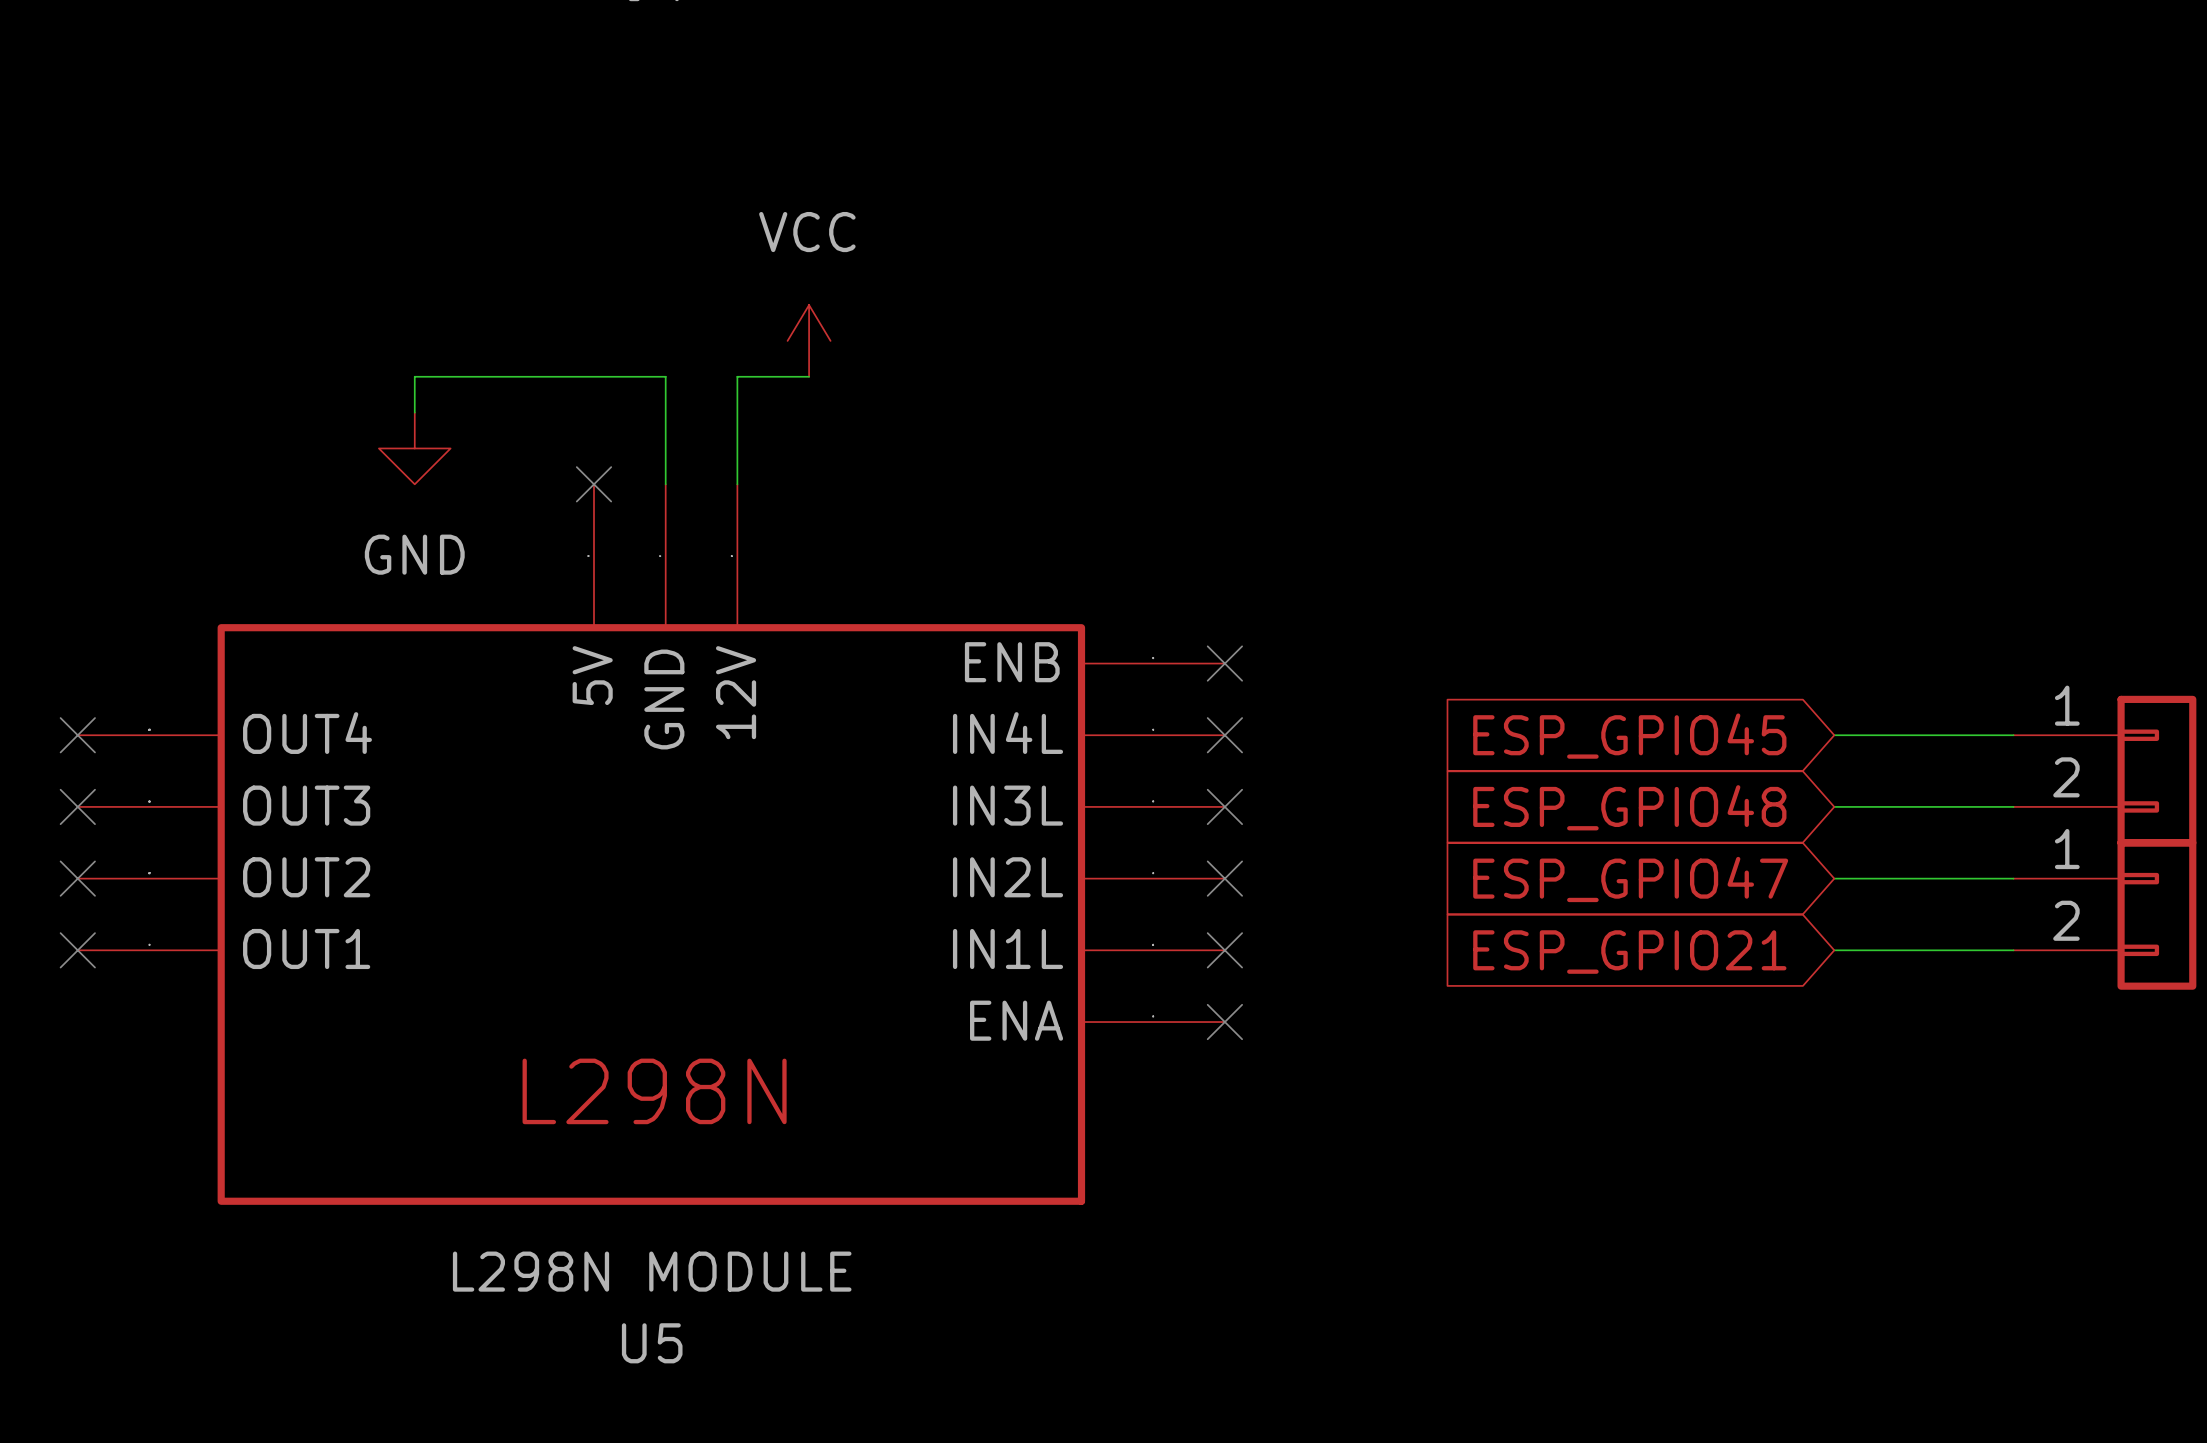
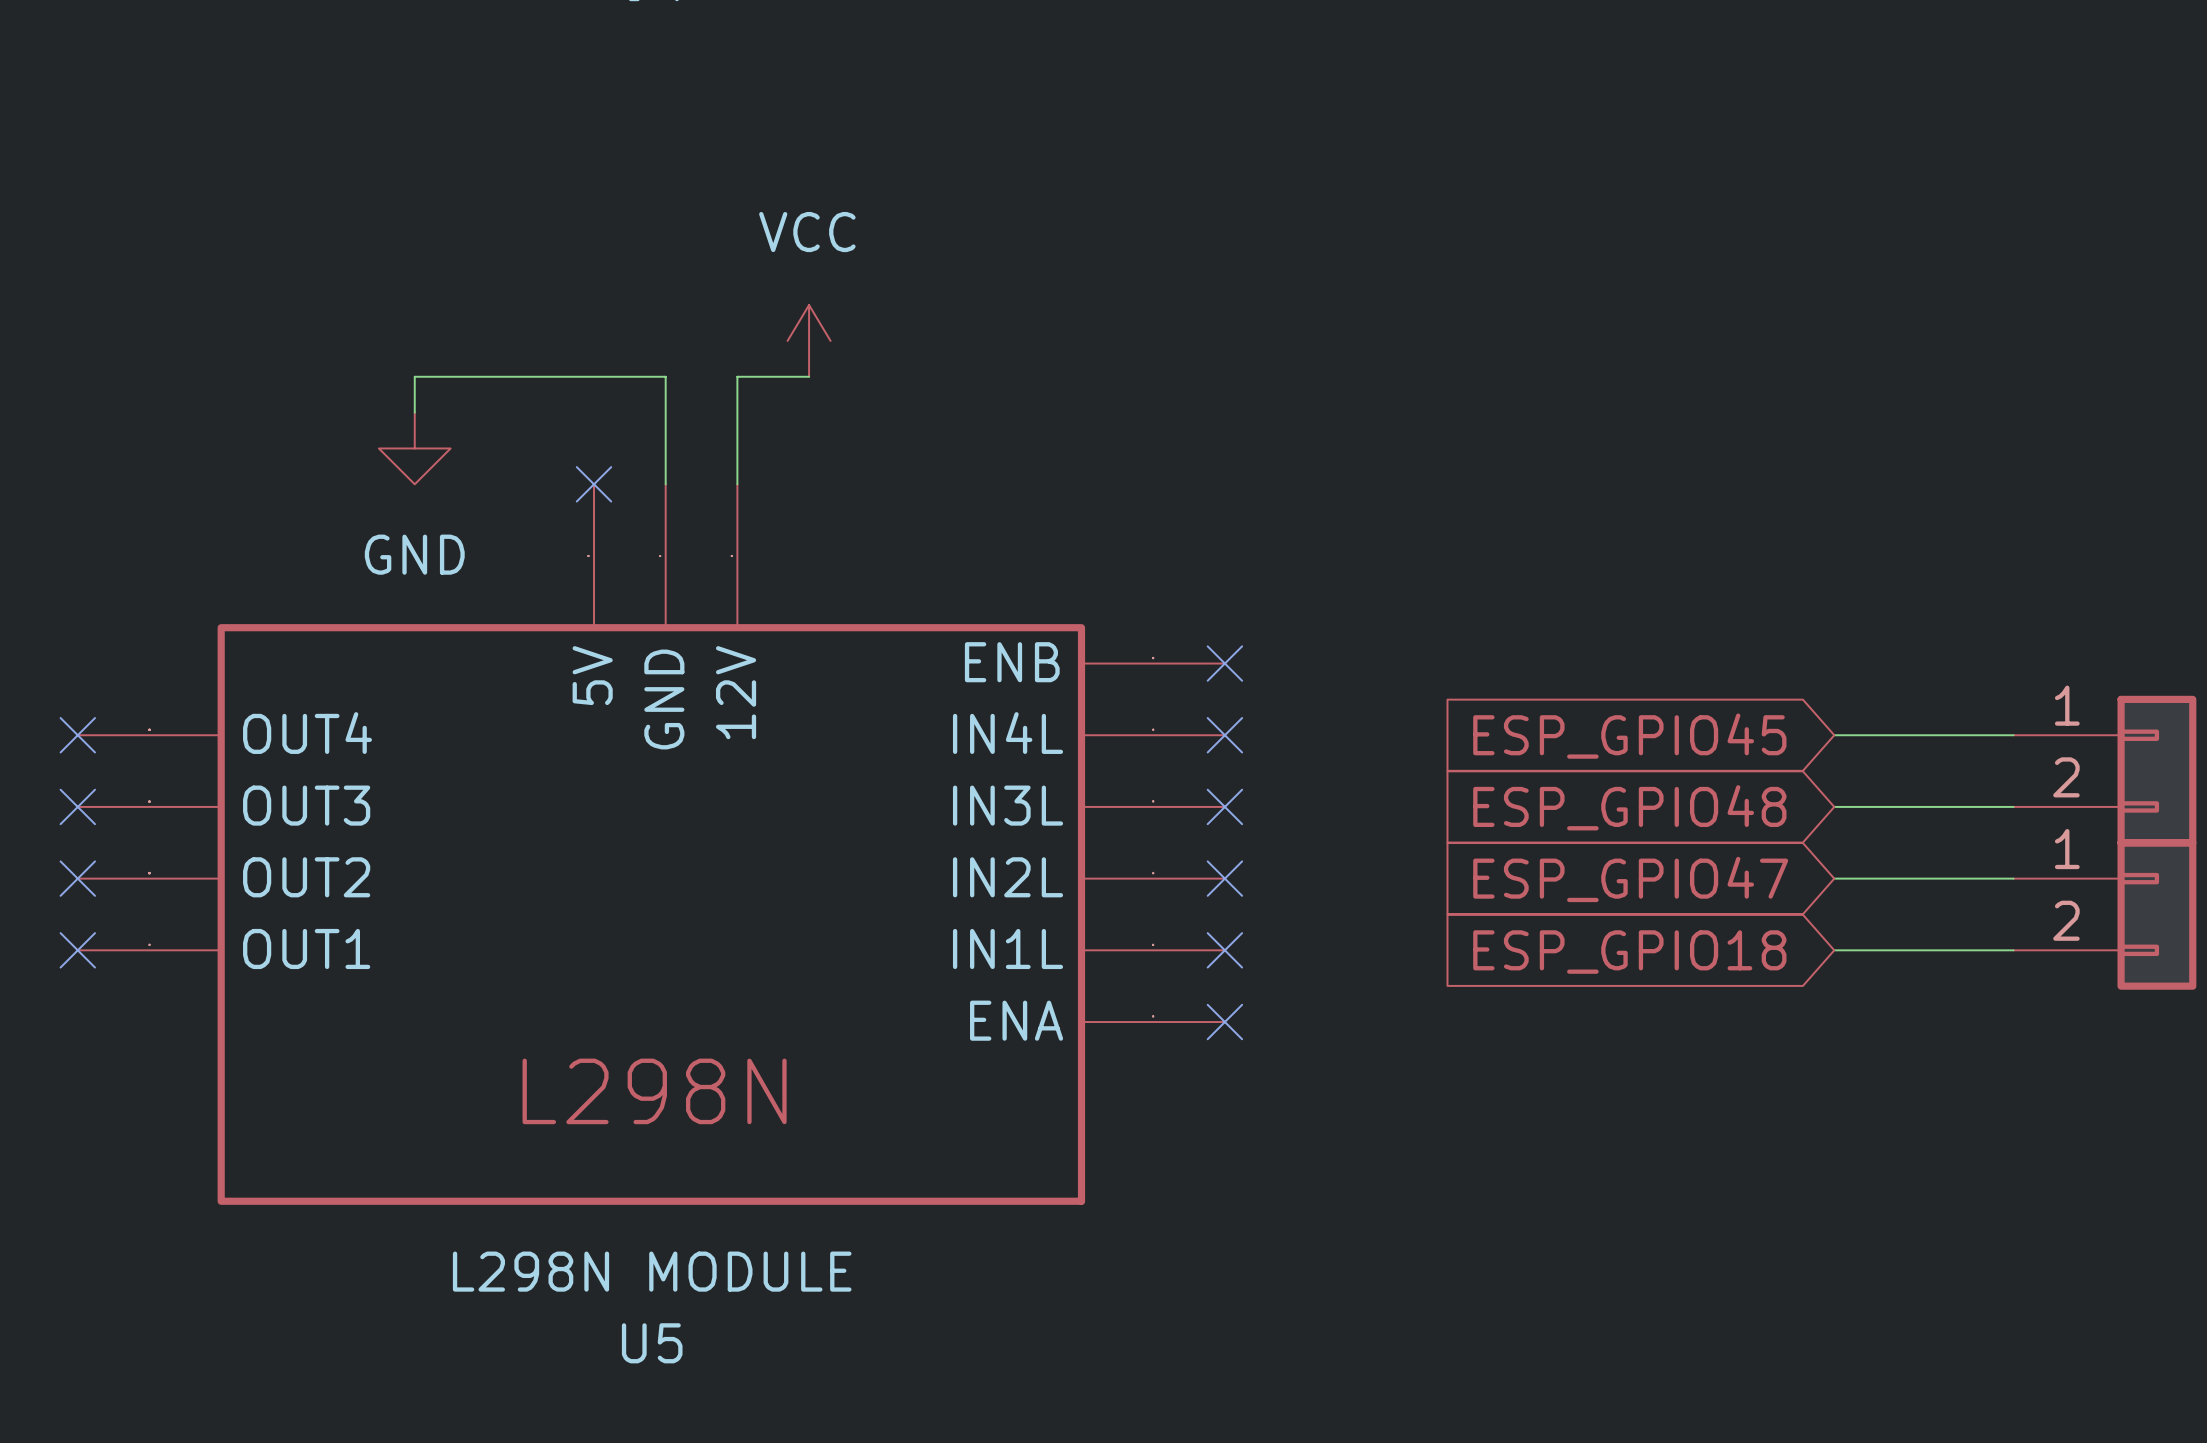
global label: ESP_GPIO21 (1629, 952) -> ESP_GPIO18 (1629, 952)

